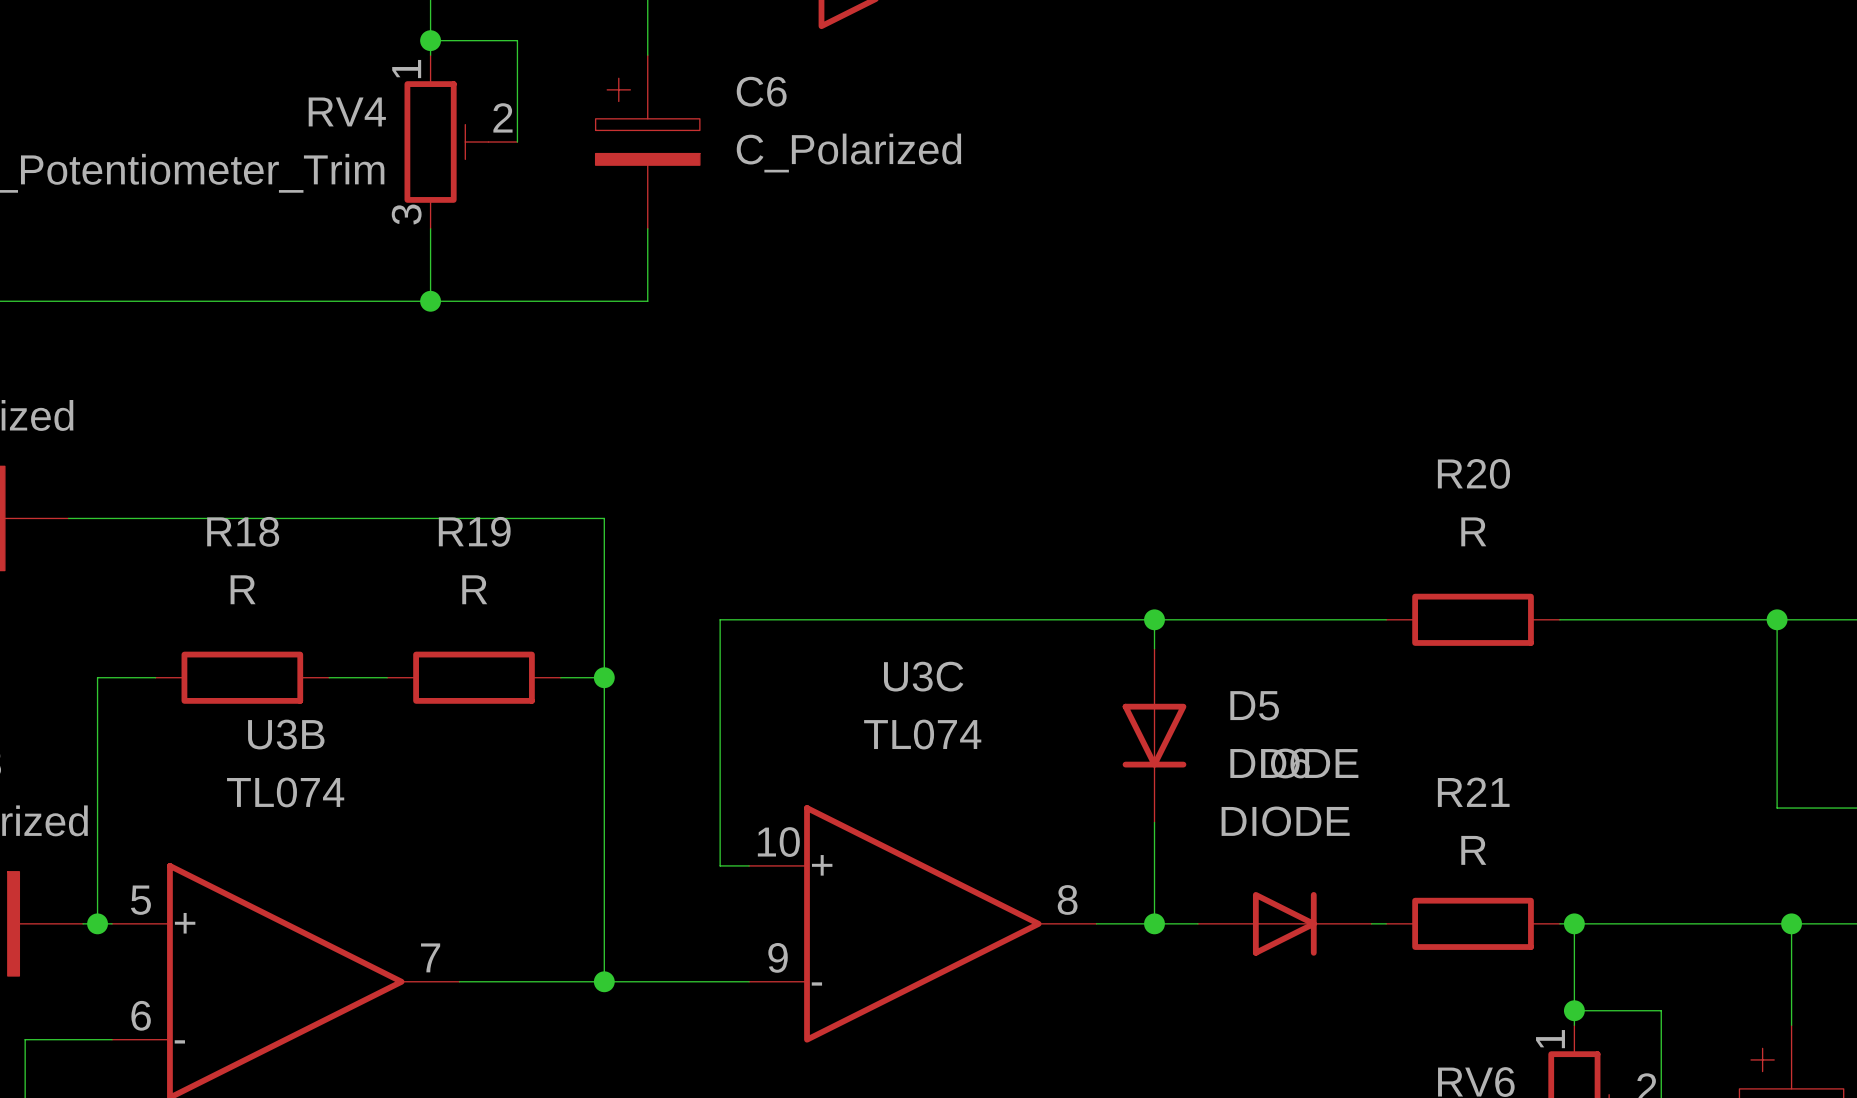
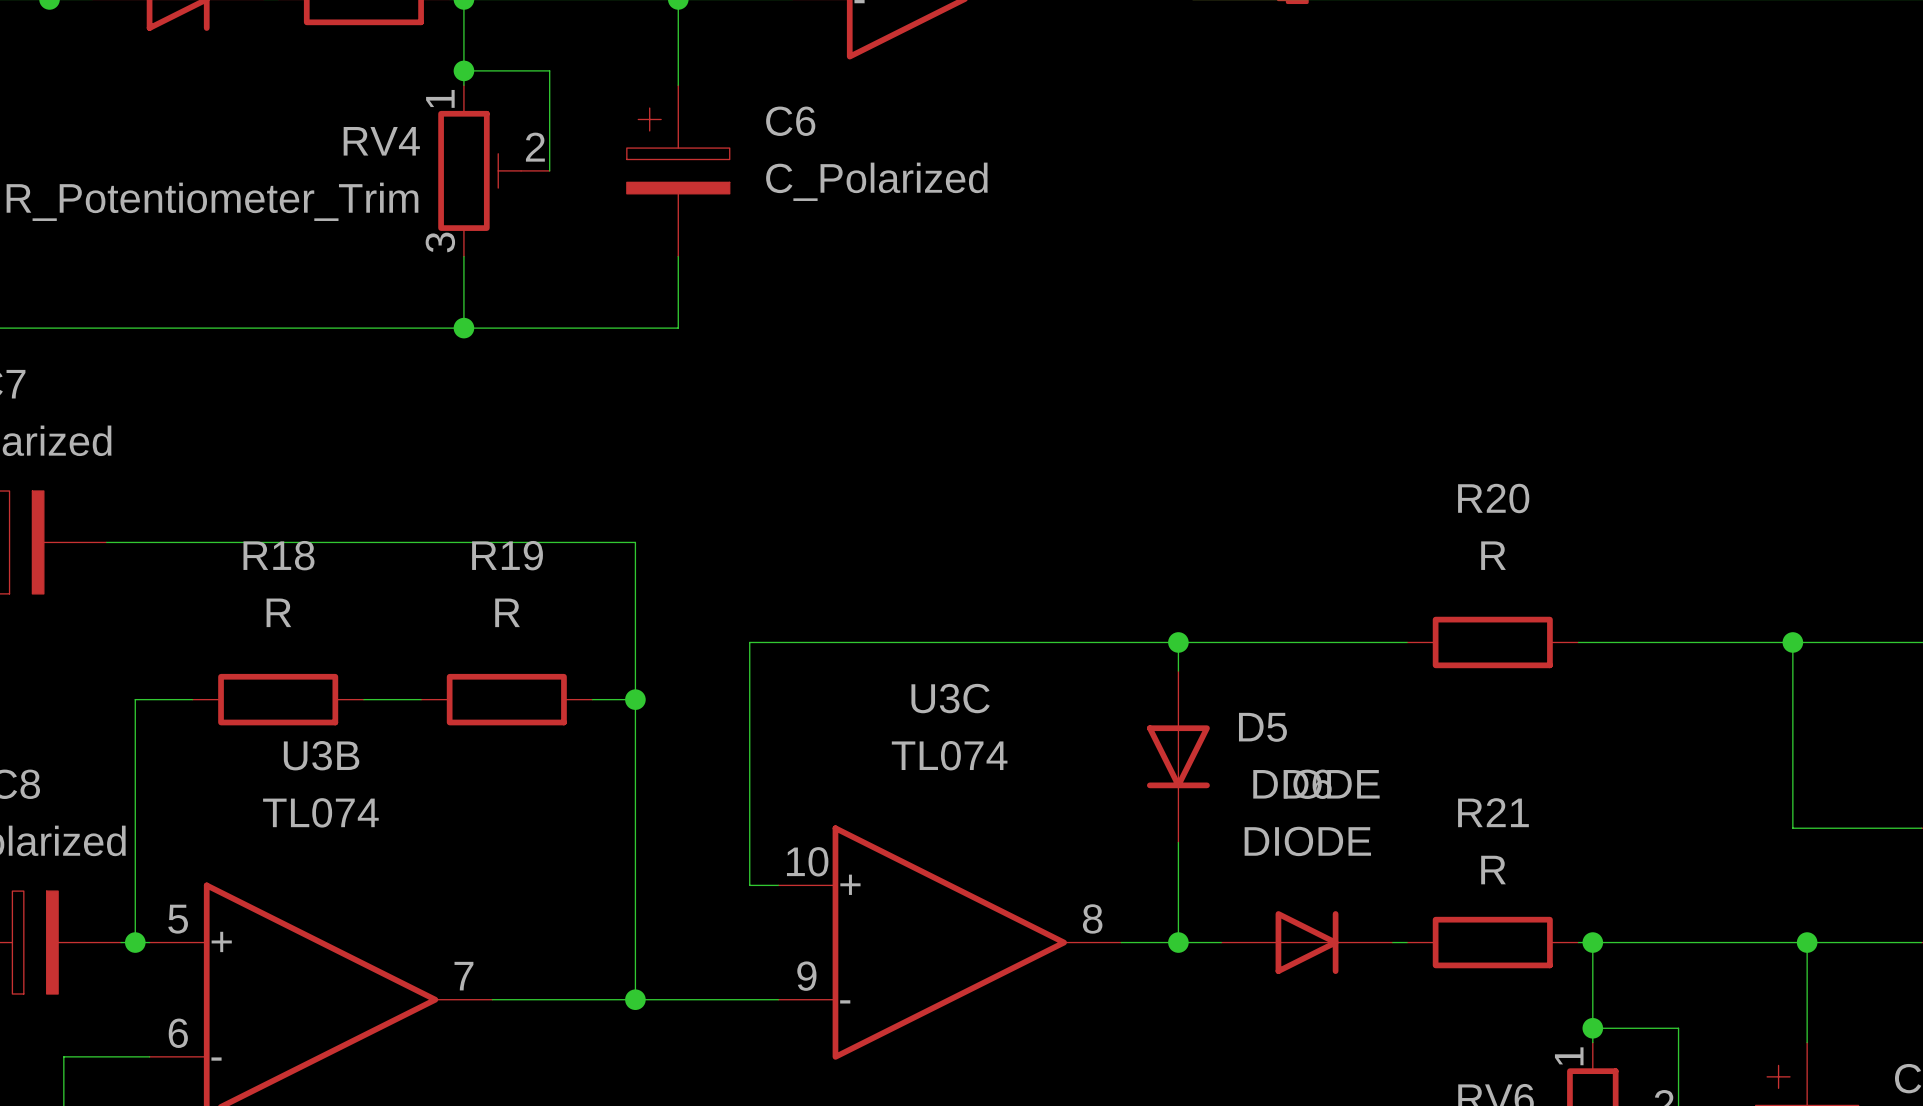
D5 name position: D5 (1254, 705) -> D5 (1262, 727)

